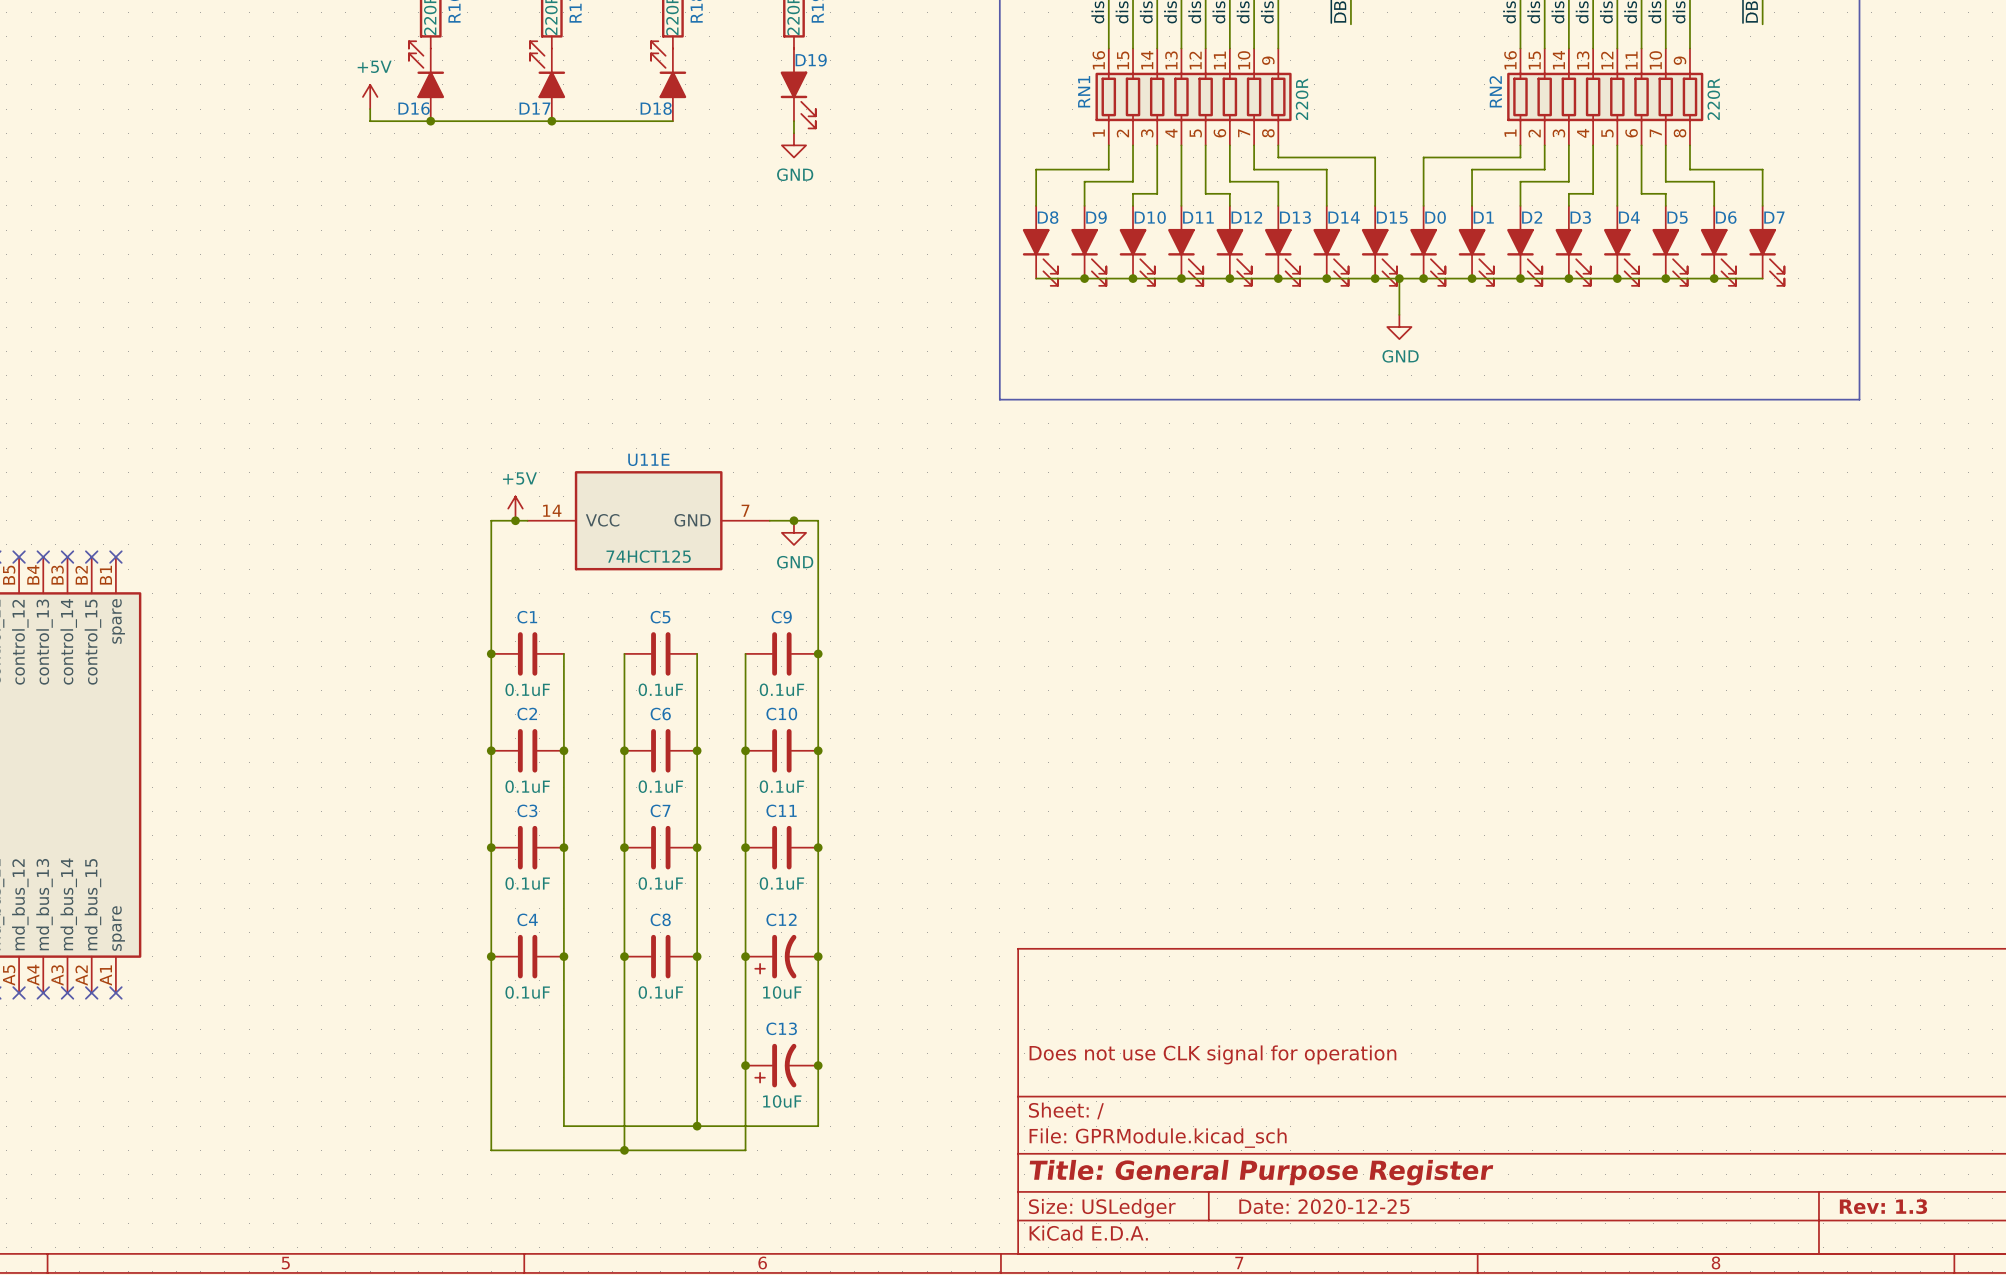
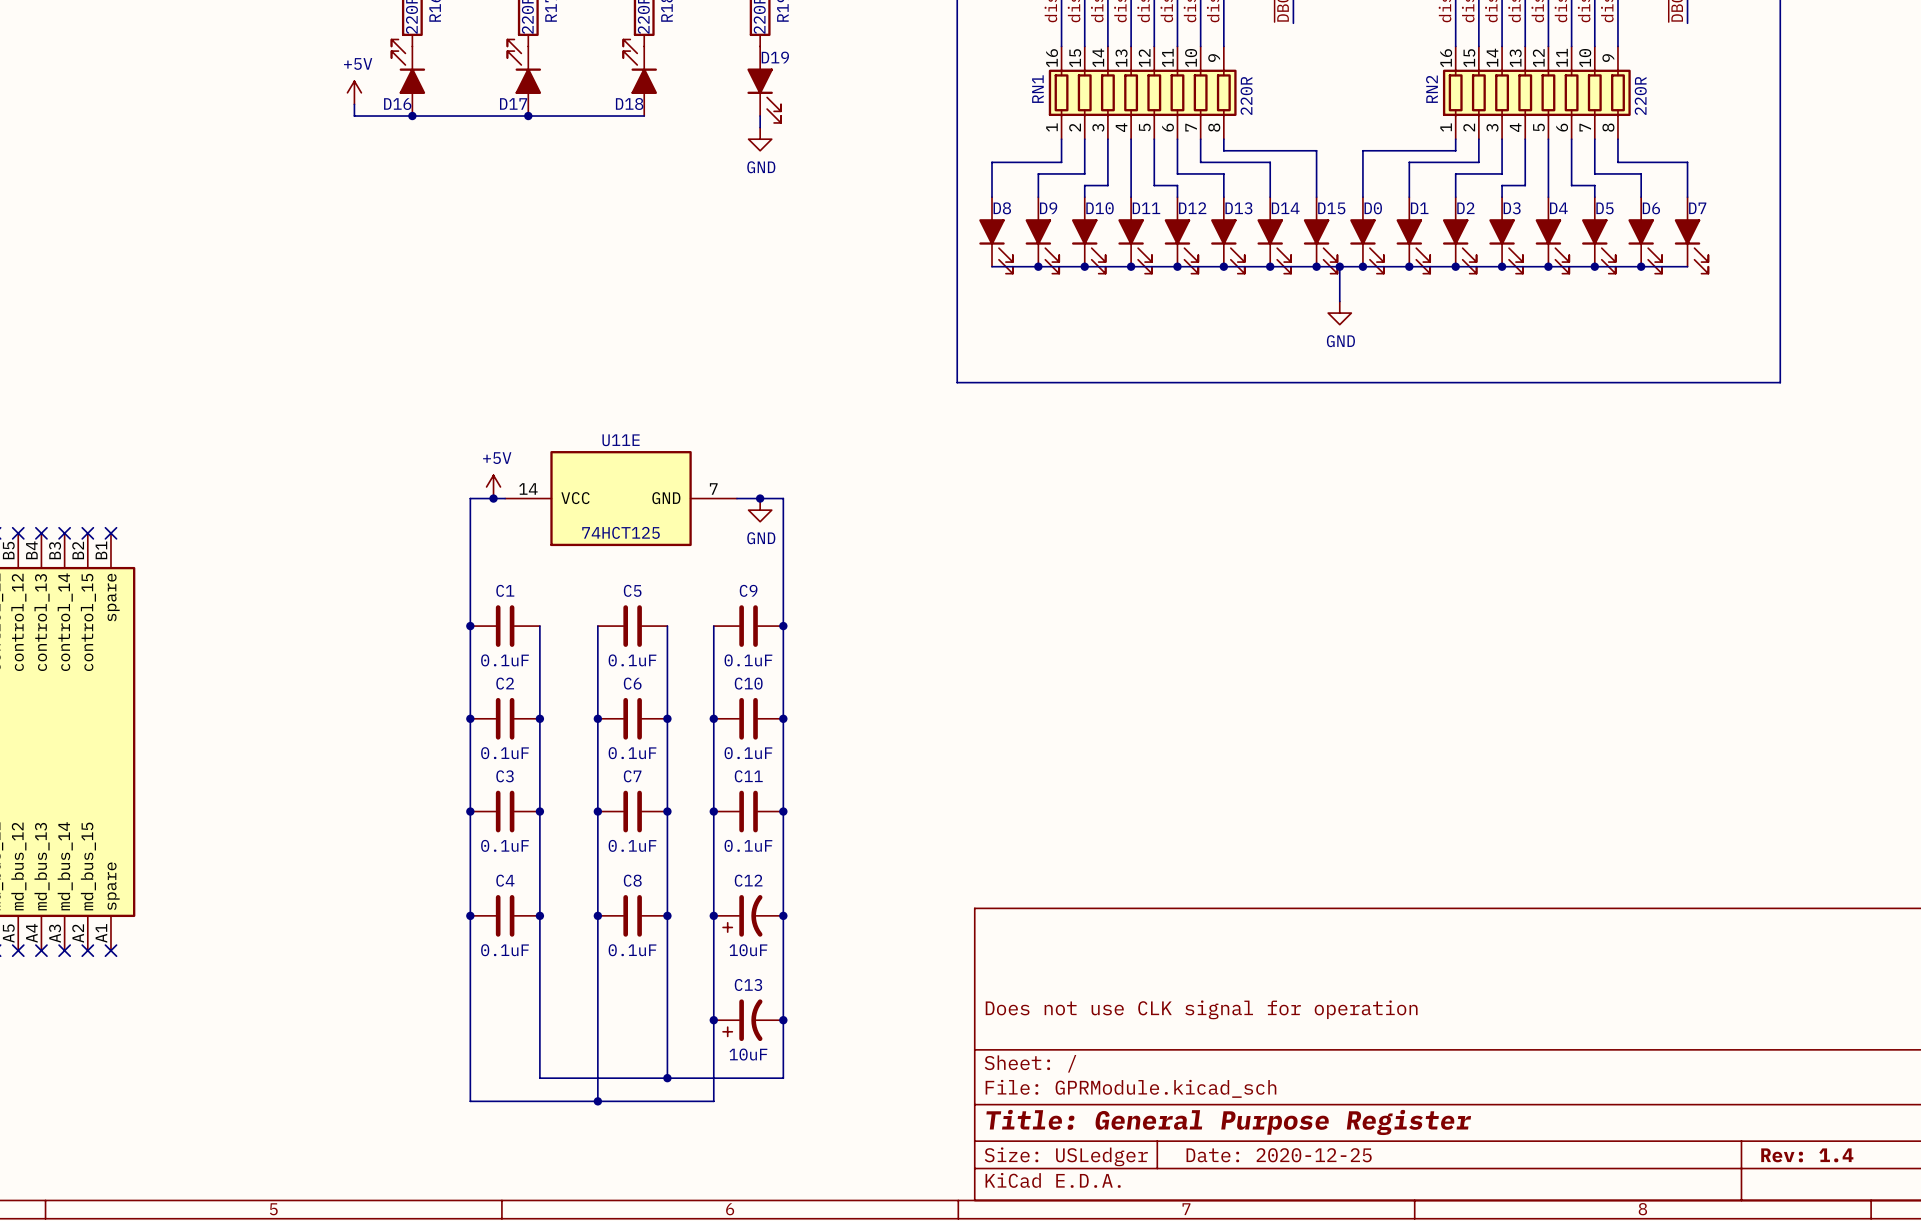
title block: Rev: 1.3 (1883, 1206) -> Rev: 1.4 (1807, 1155)

